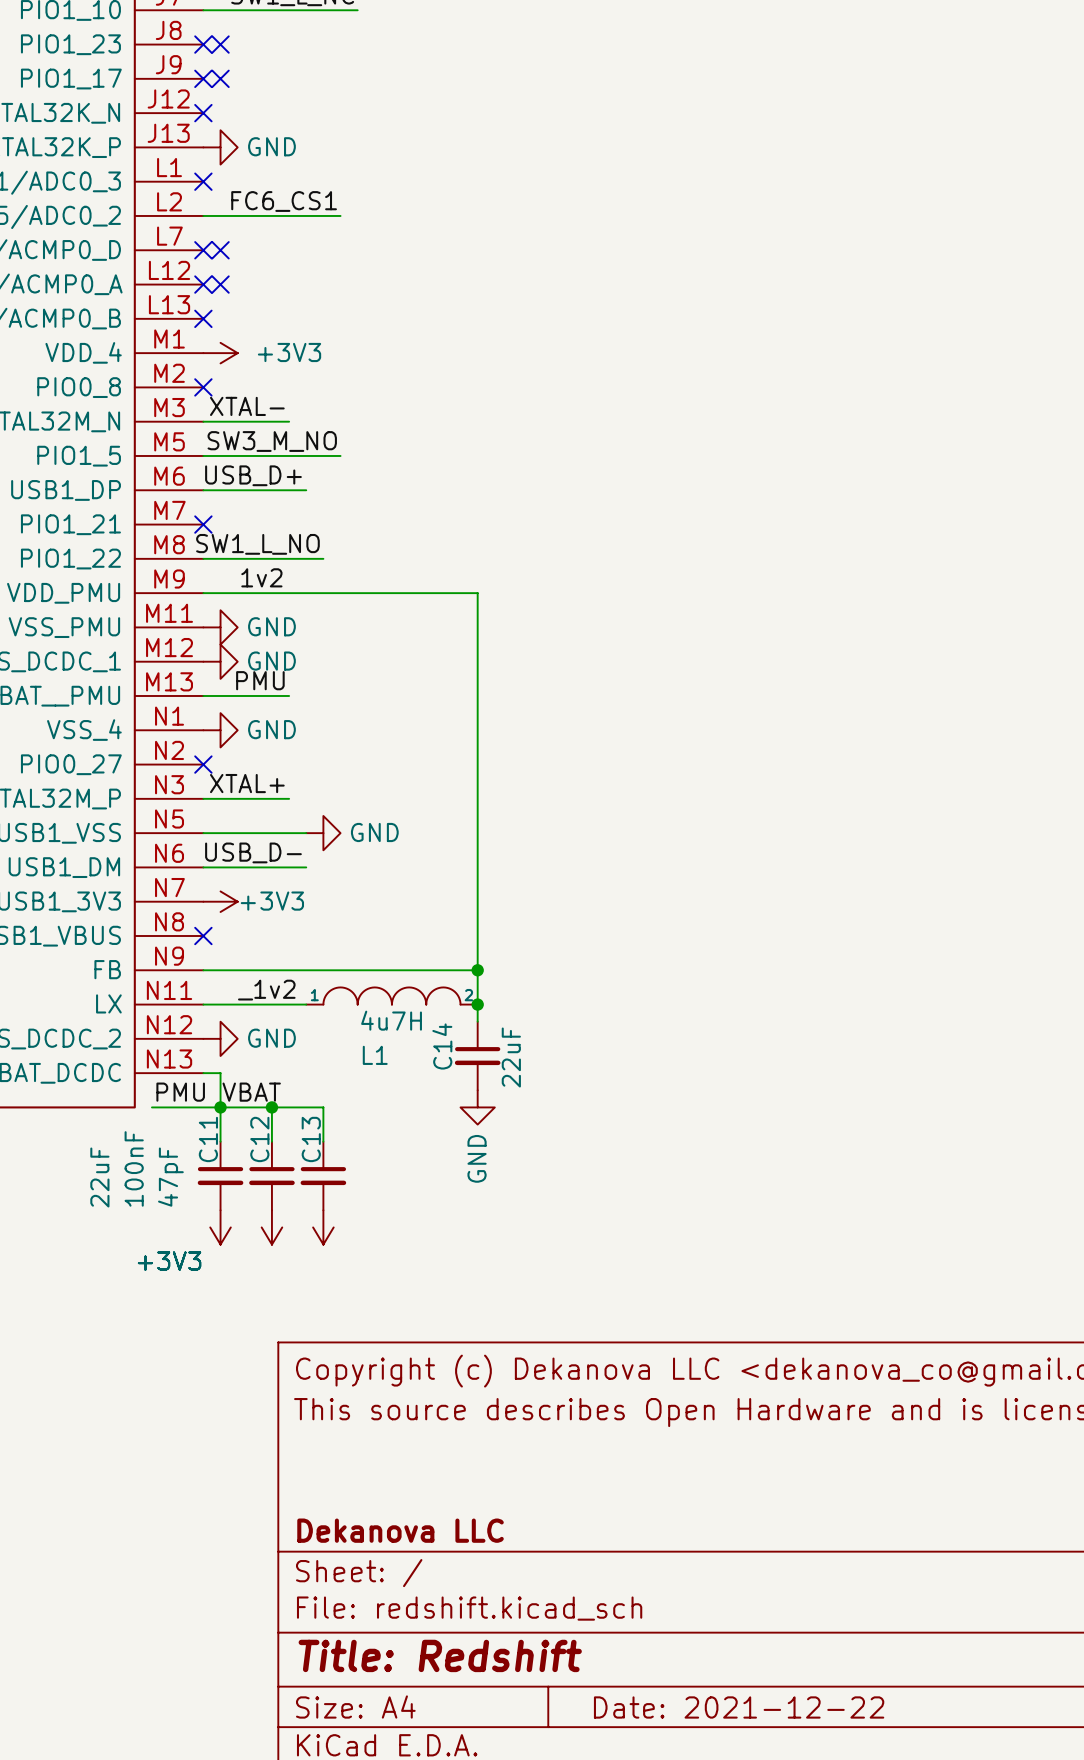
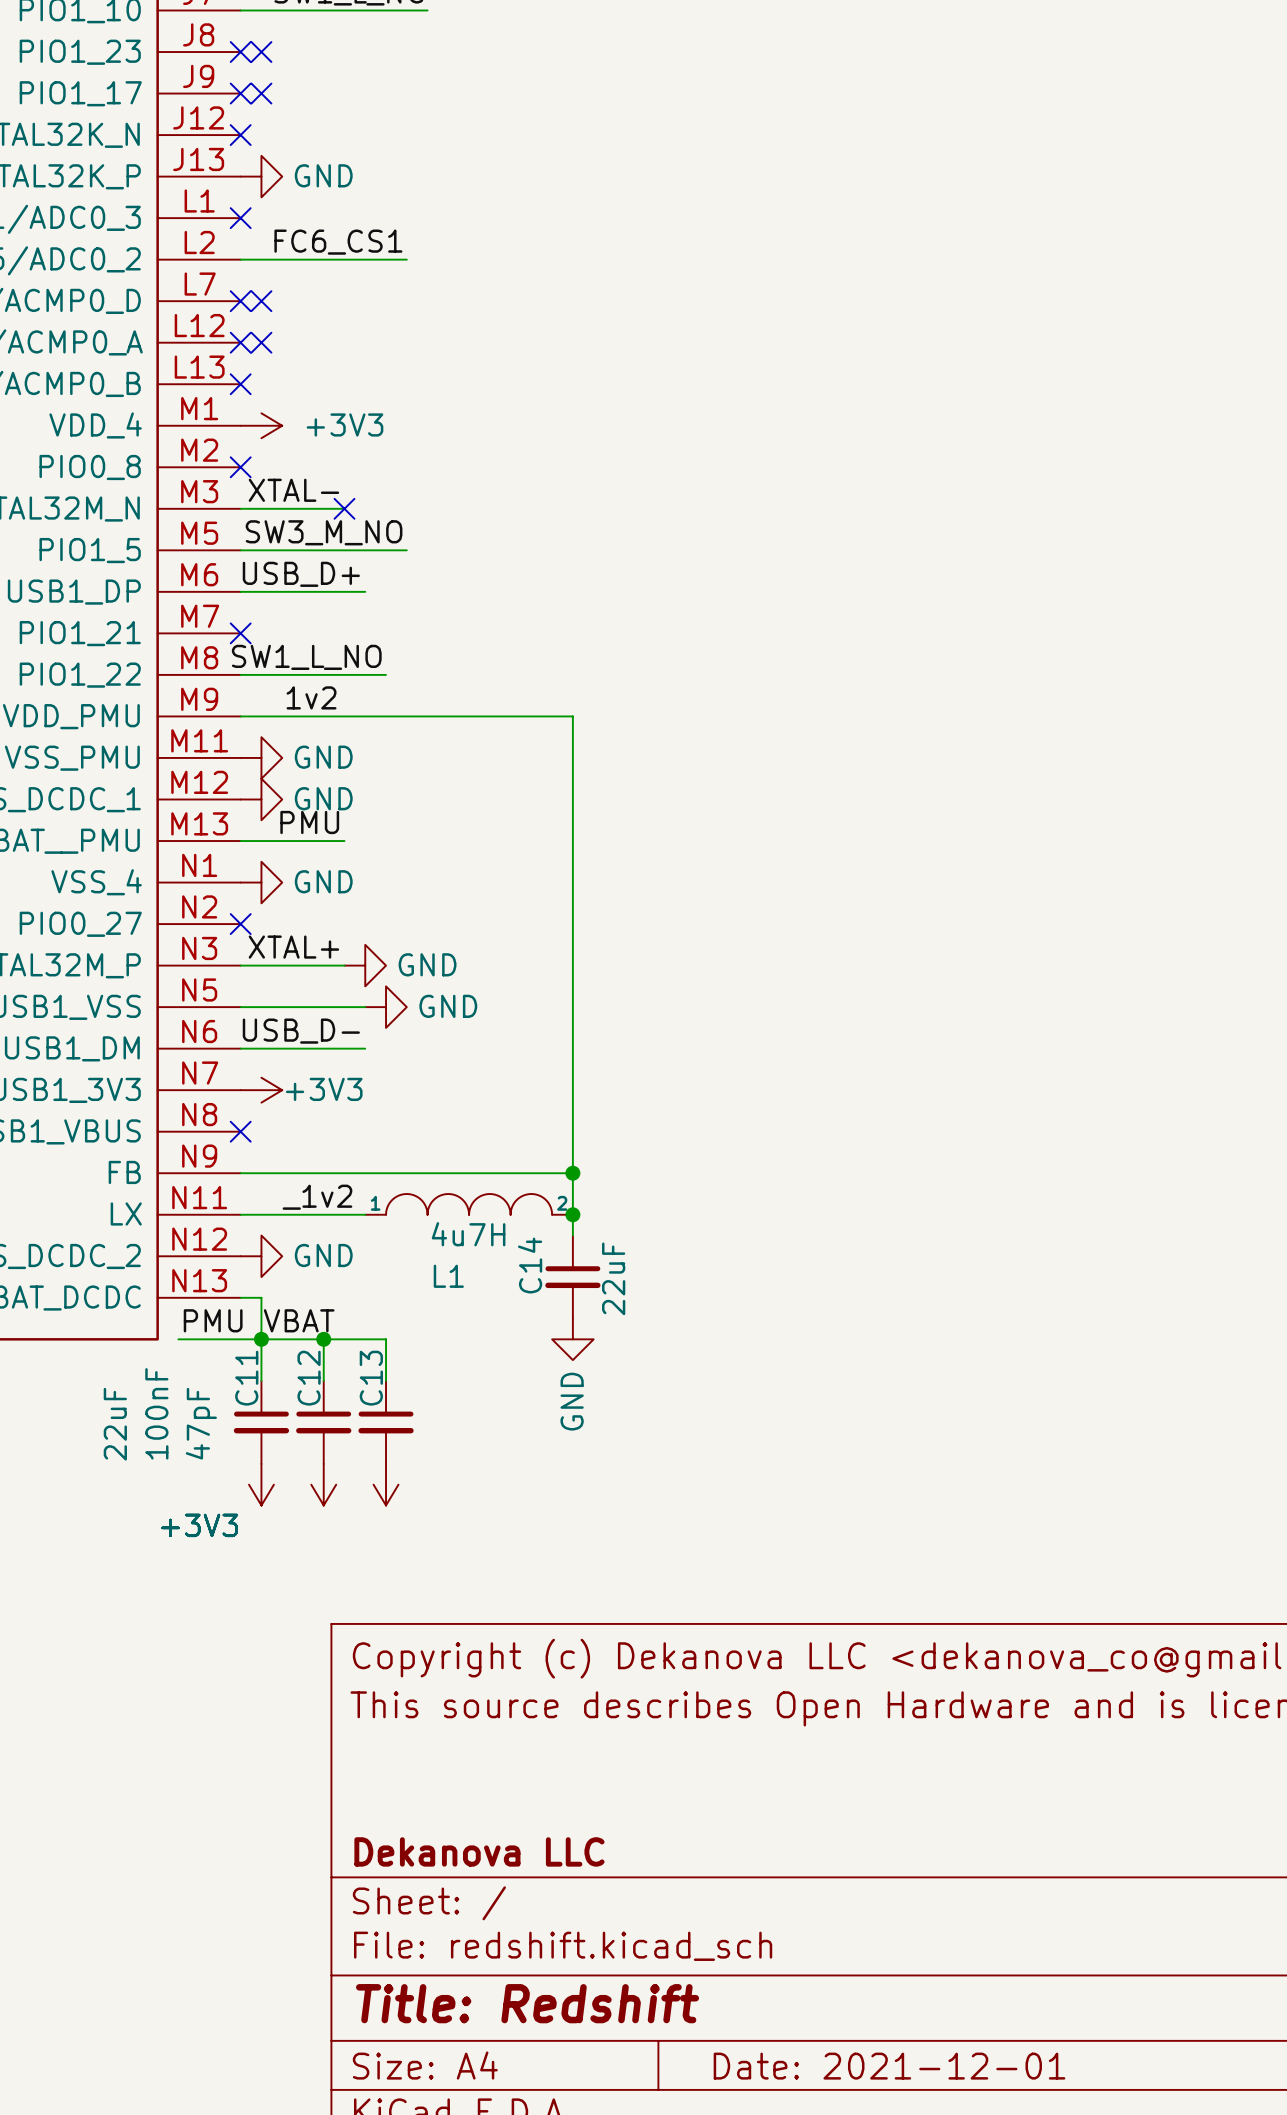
no-connect mark: none -> (344, 508)
power symbol: none -> GND (365, 965)
title block: Date: 2021-12-22 (739, 1707) -> Date: 2021-12-01 (889, 2066)

